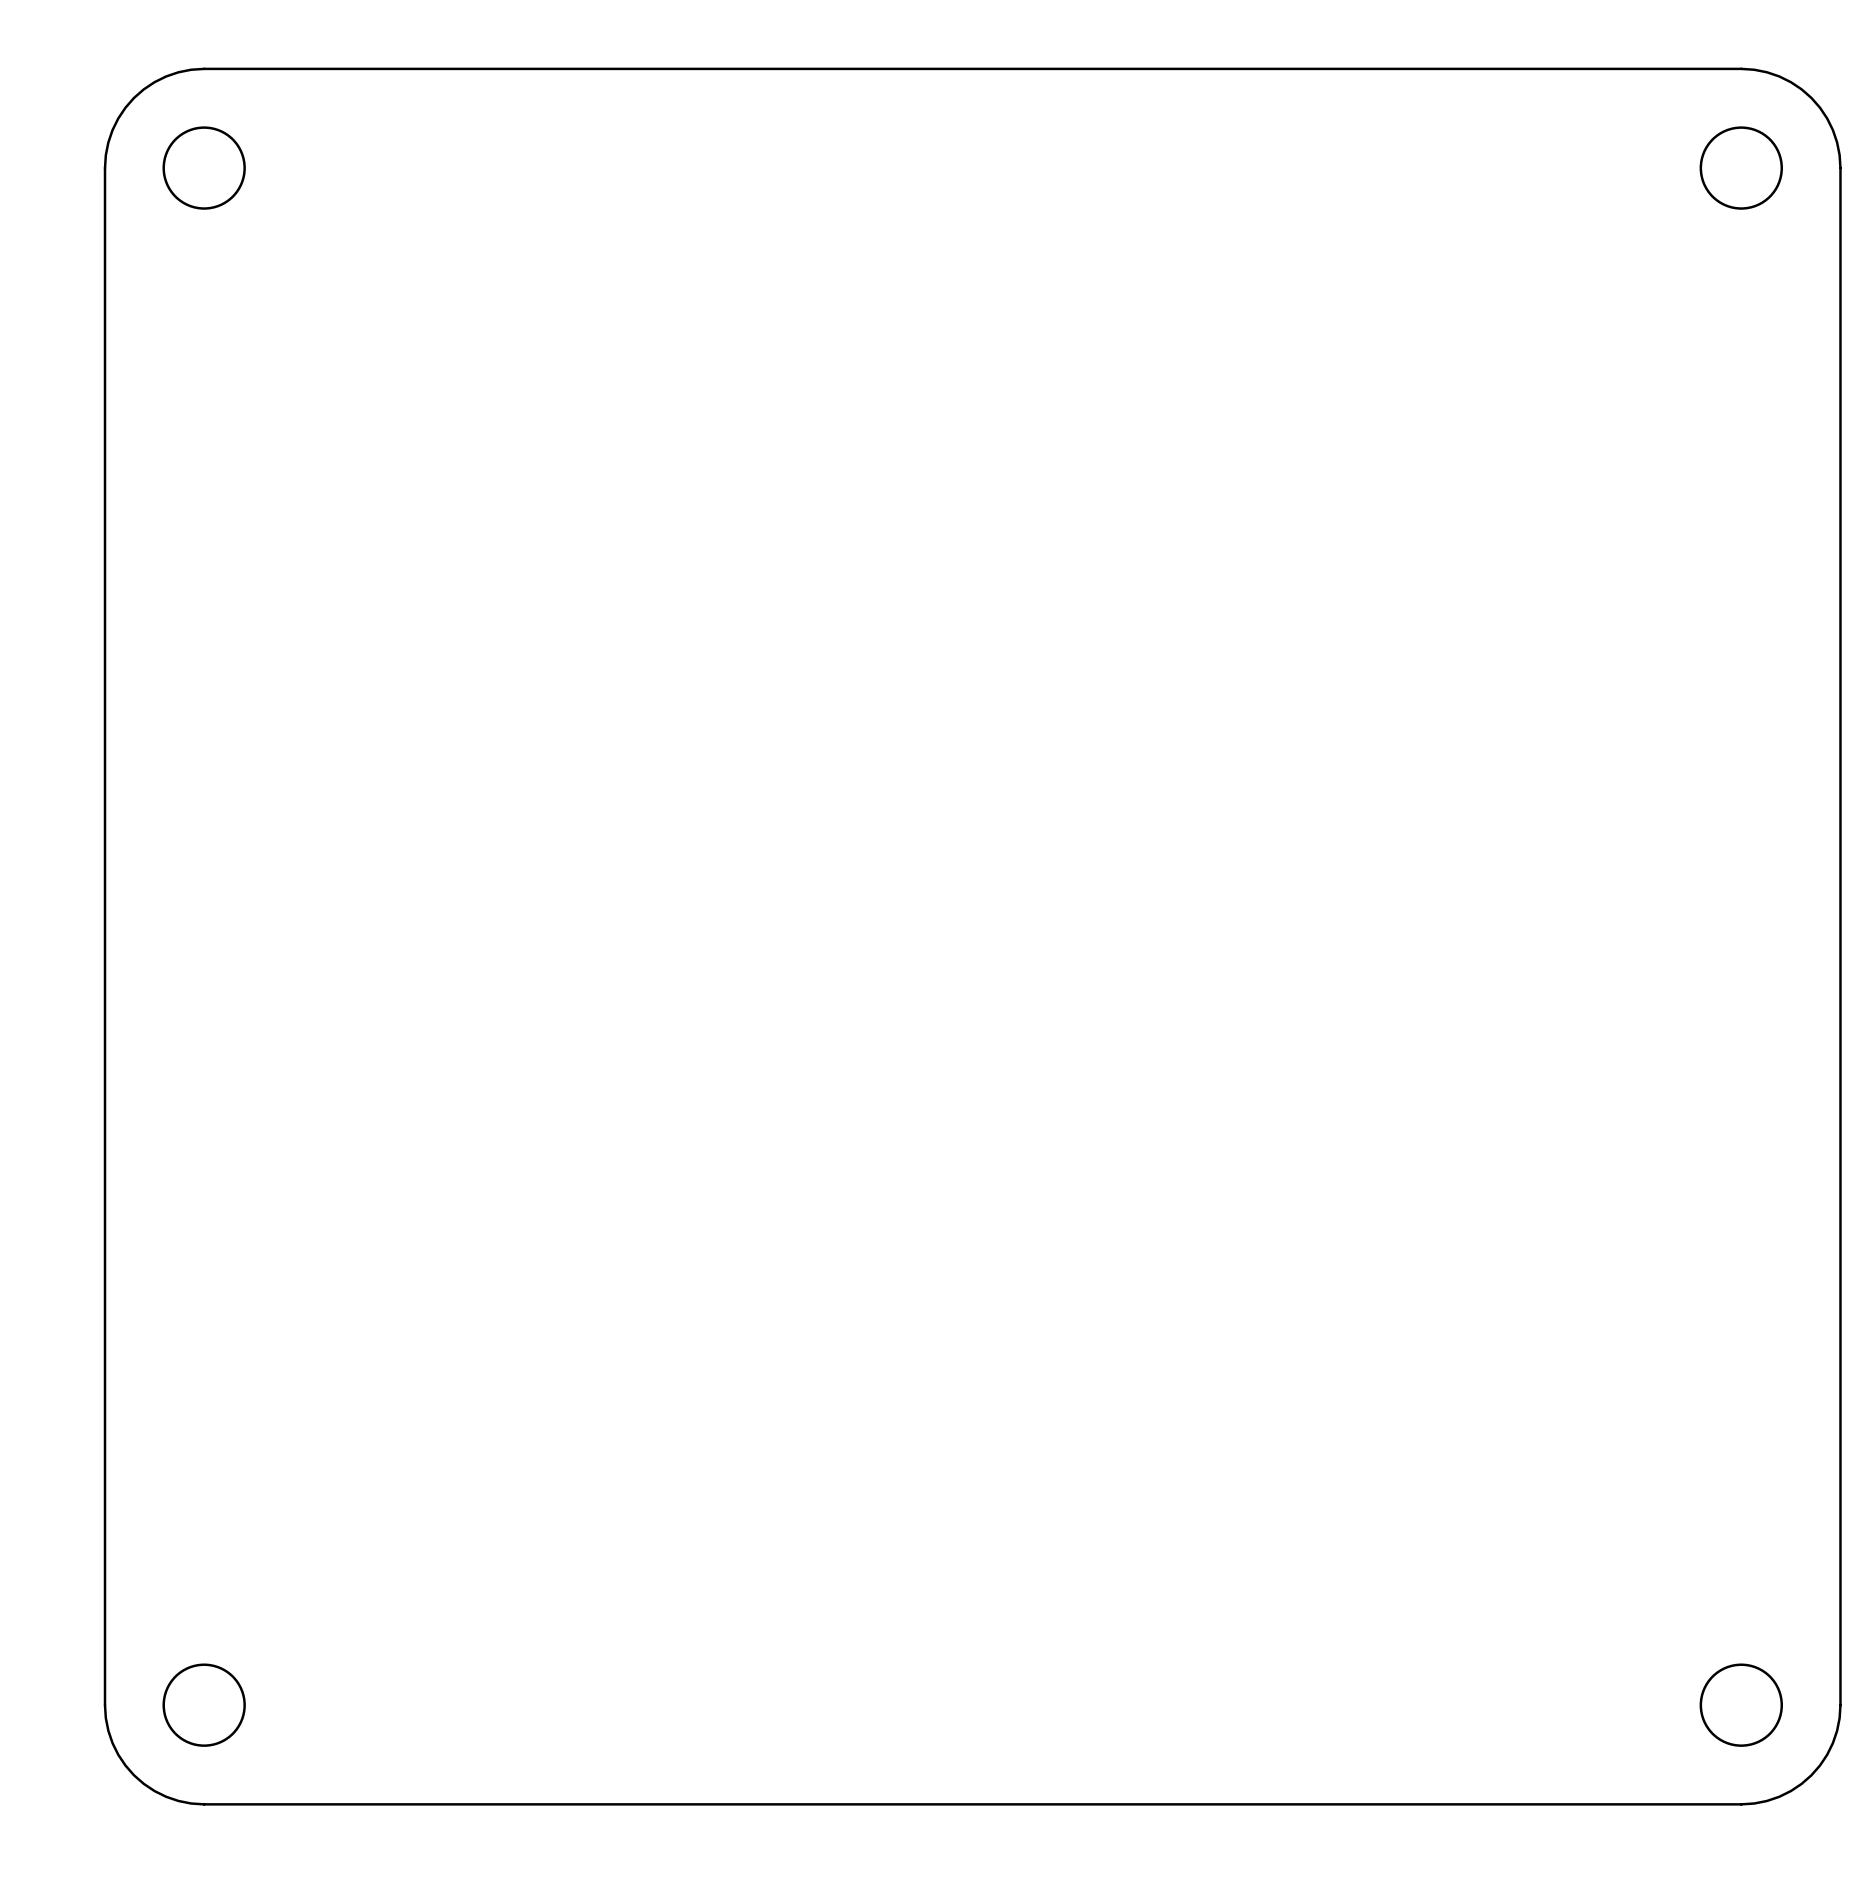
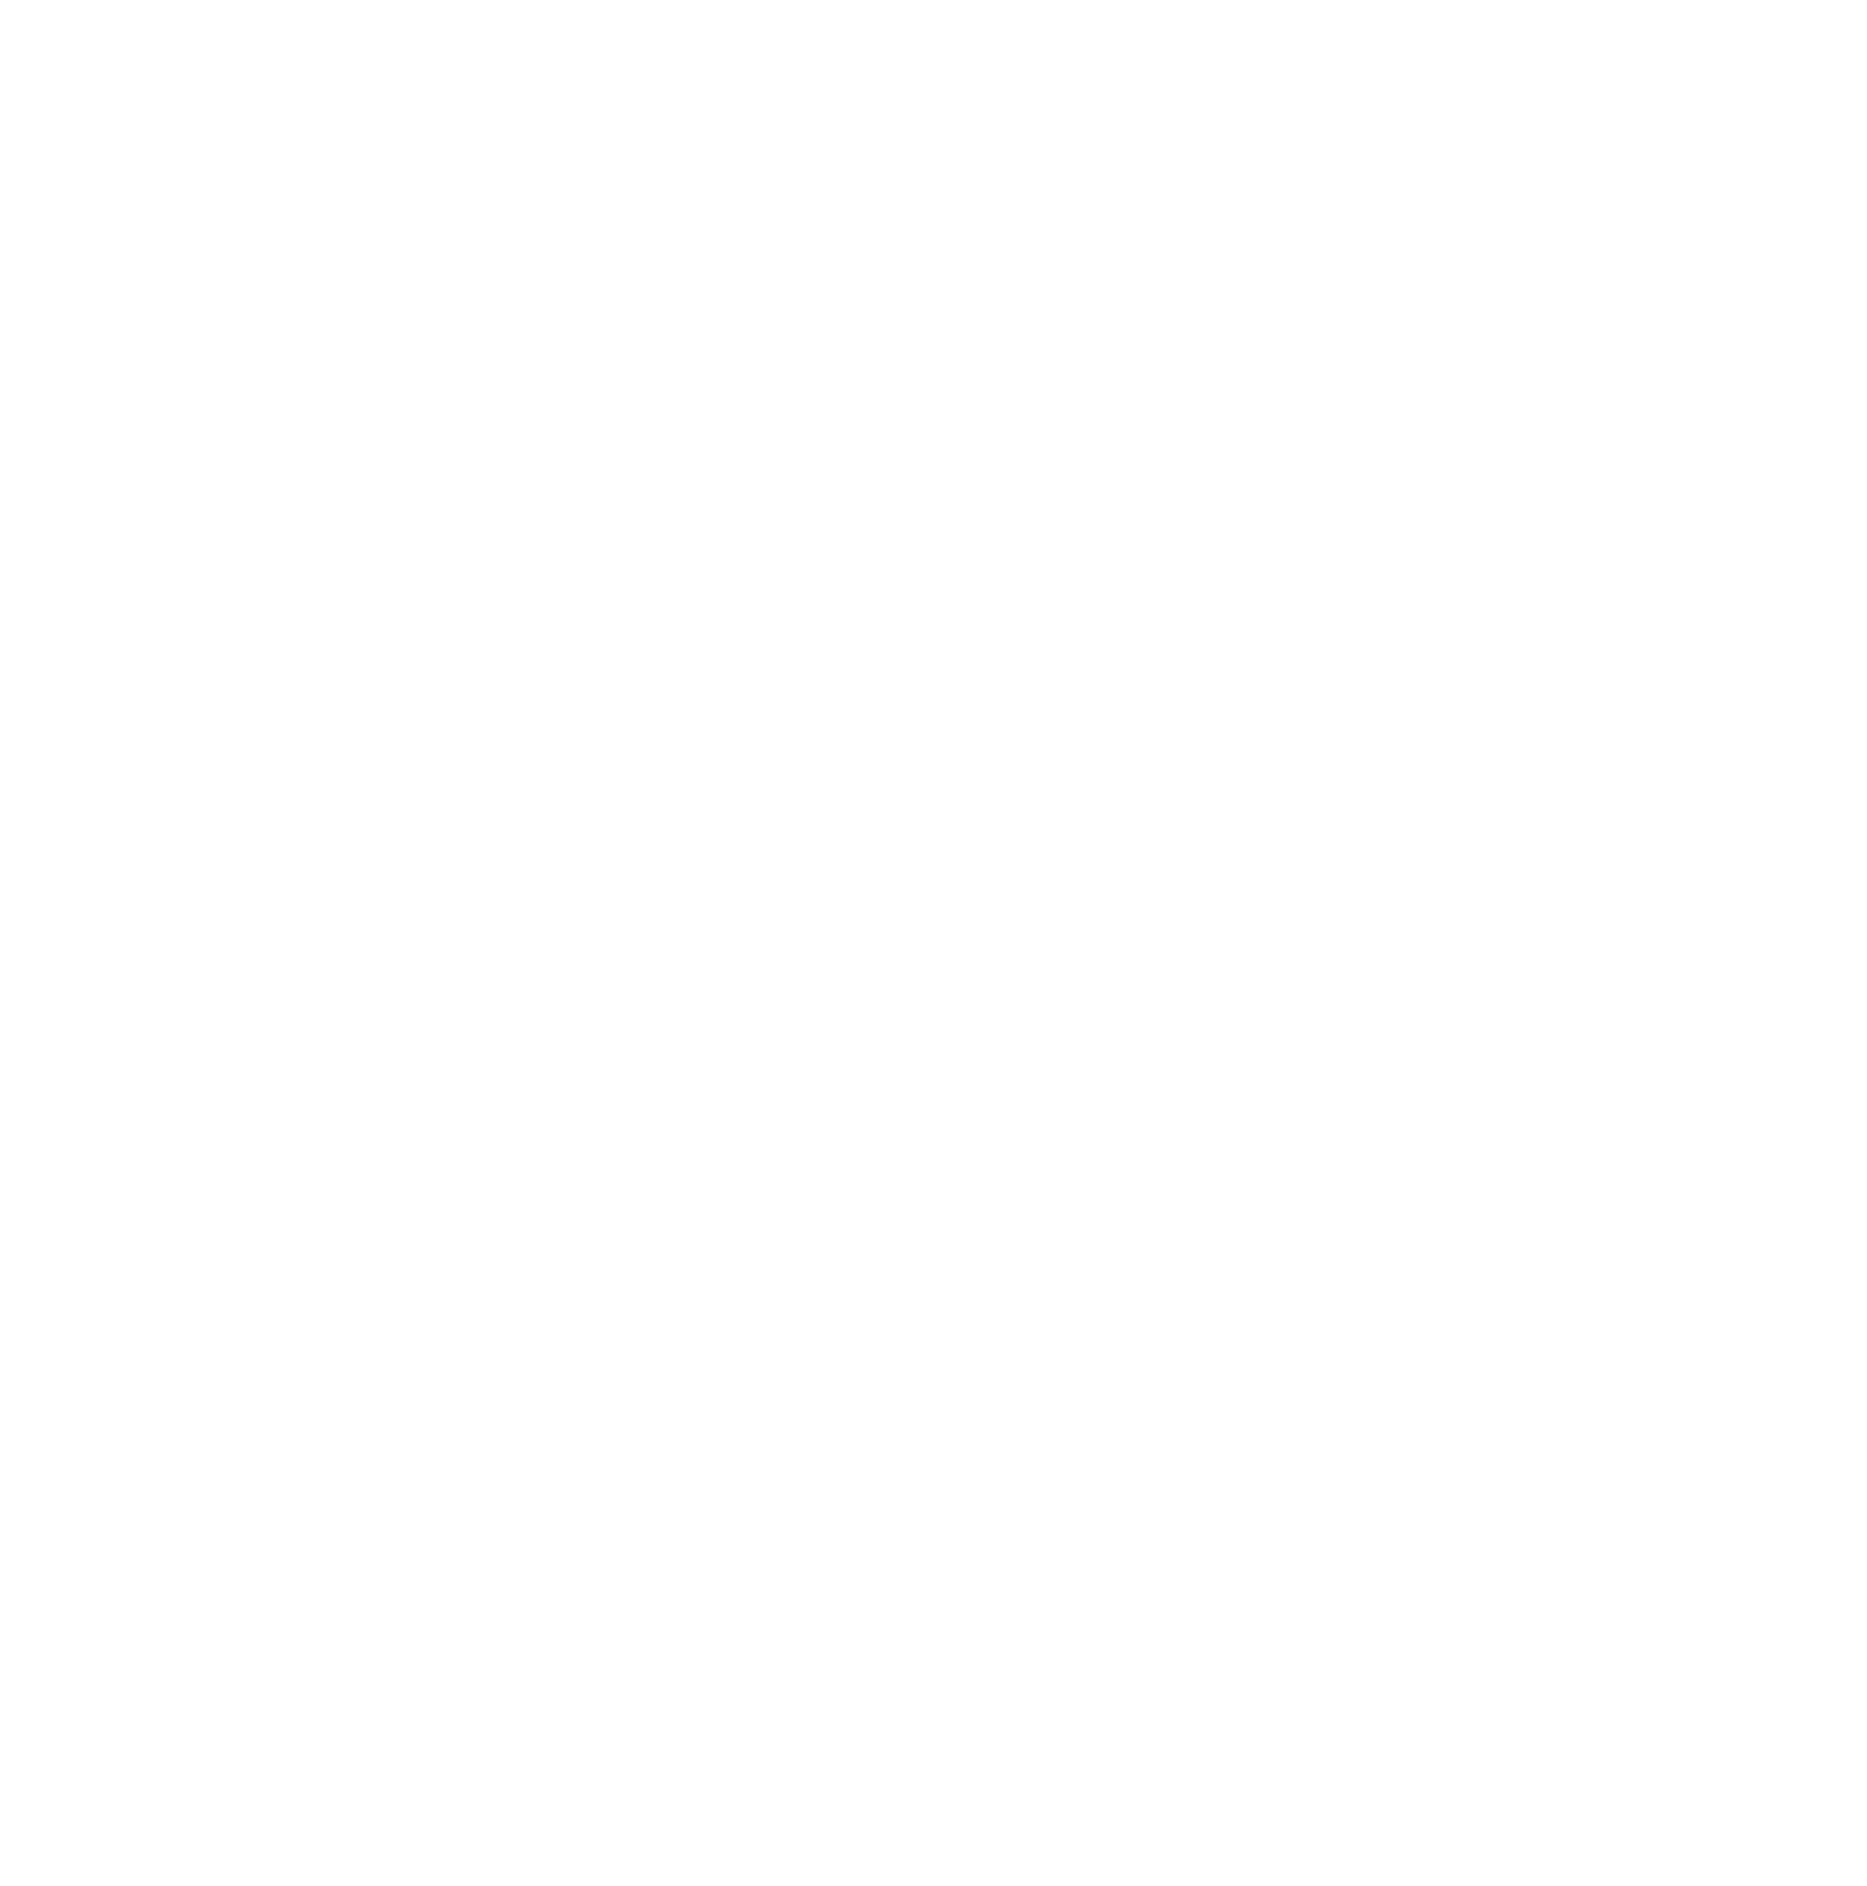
board edge: (204, 68) (1741, 68) (1766, 72) (1779, 76) (1801, 89) (1811, 97) (1819, 107) (1832, 130) (1837, 142) (1840, 168) (1840, 1705) (1837, 1730) (1832, 1743) (1819, 1765) (1811, 1775) (1790, 1791) (1779, 1796) (1766, 1800) (1741, 1804) (204, 1804) (178, 1800) (166, 1796) (154, 1791) (134, 1775) (125, 1765) (112, 1743) (105, 1718) (105, 1705) (105, 168) (105, 155) (112, 130) (118, 118) (134, 97) (143, 89) (166, 76) (178, 72) (204, 68) -> none
round board edge: [162, 126, 246, 210] -> none
round board edge: [1699, 126, 1784, 210] -> none
round board edge: [162, 1663, 246, 1747] -> none
round board edge: [1699, 1663, 1784, 1747] -> none

